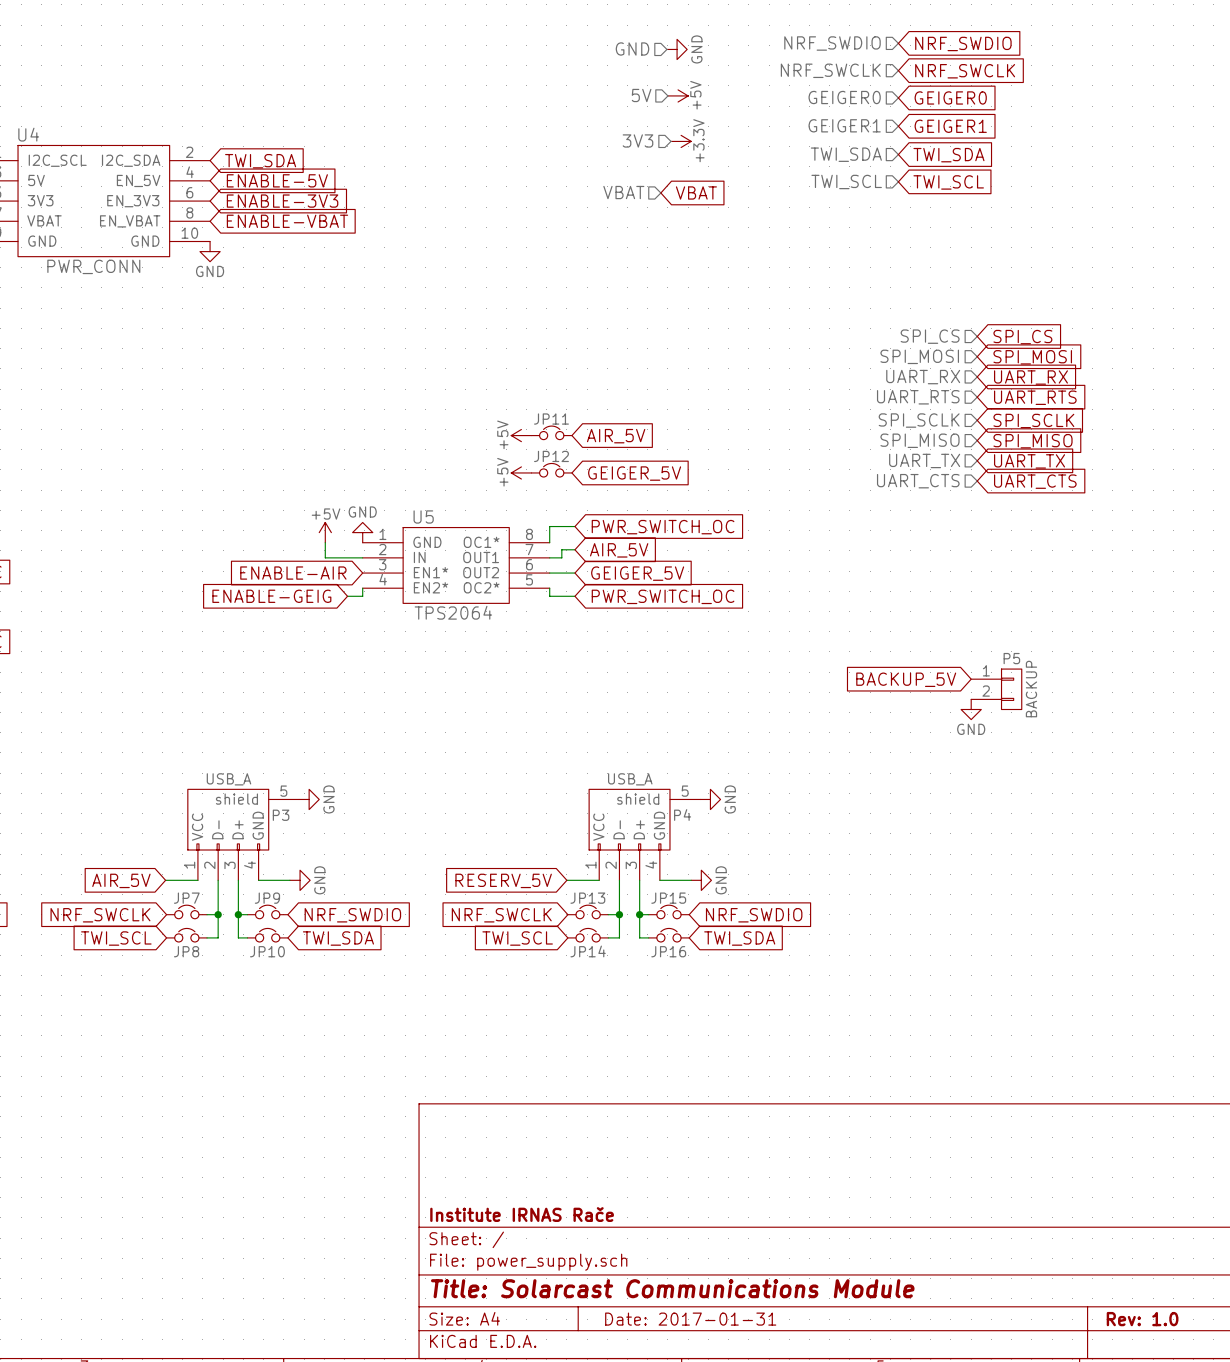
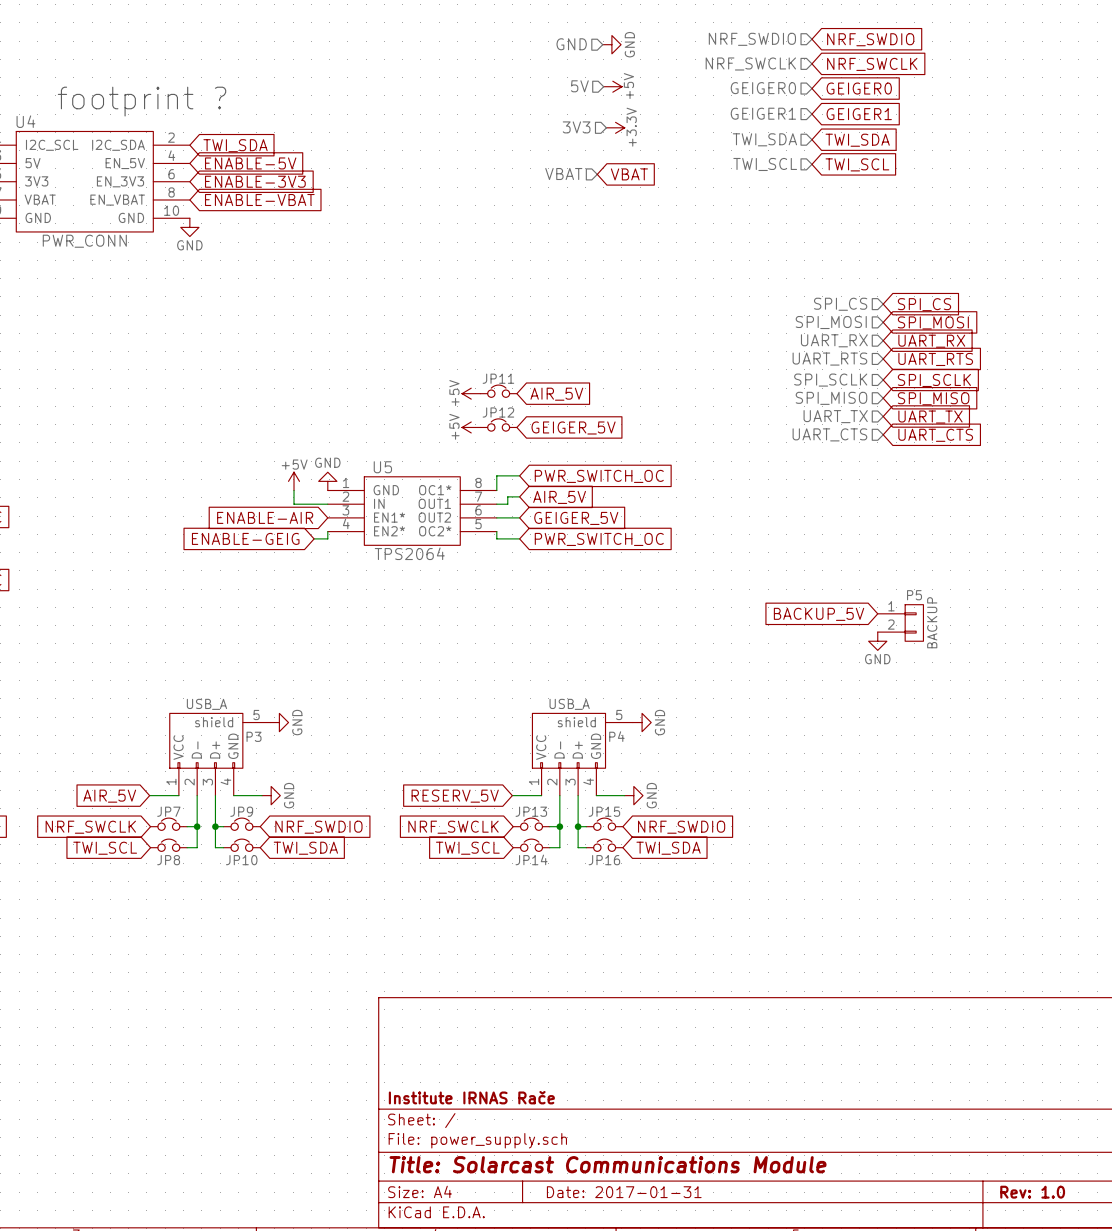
text: none -> footprint ? (142, 101)

